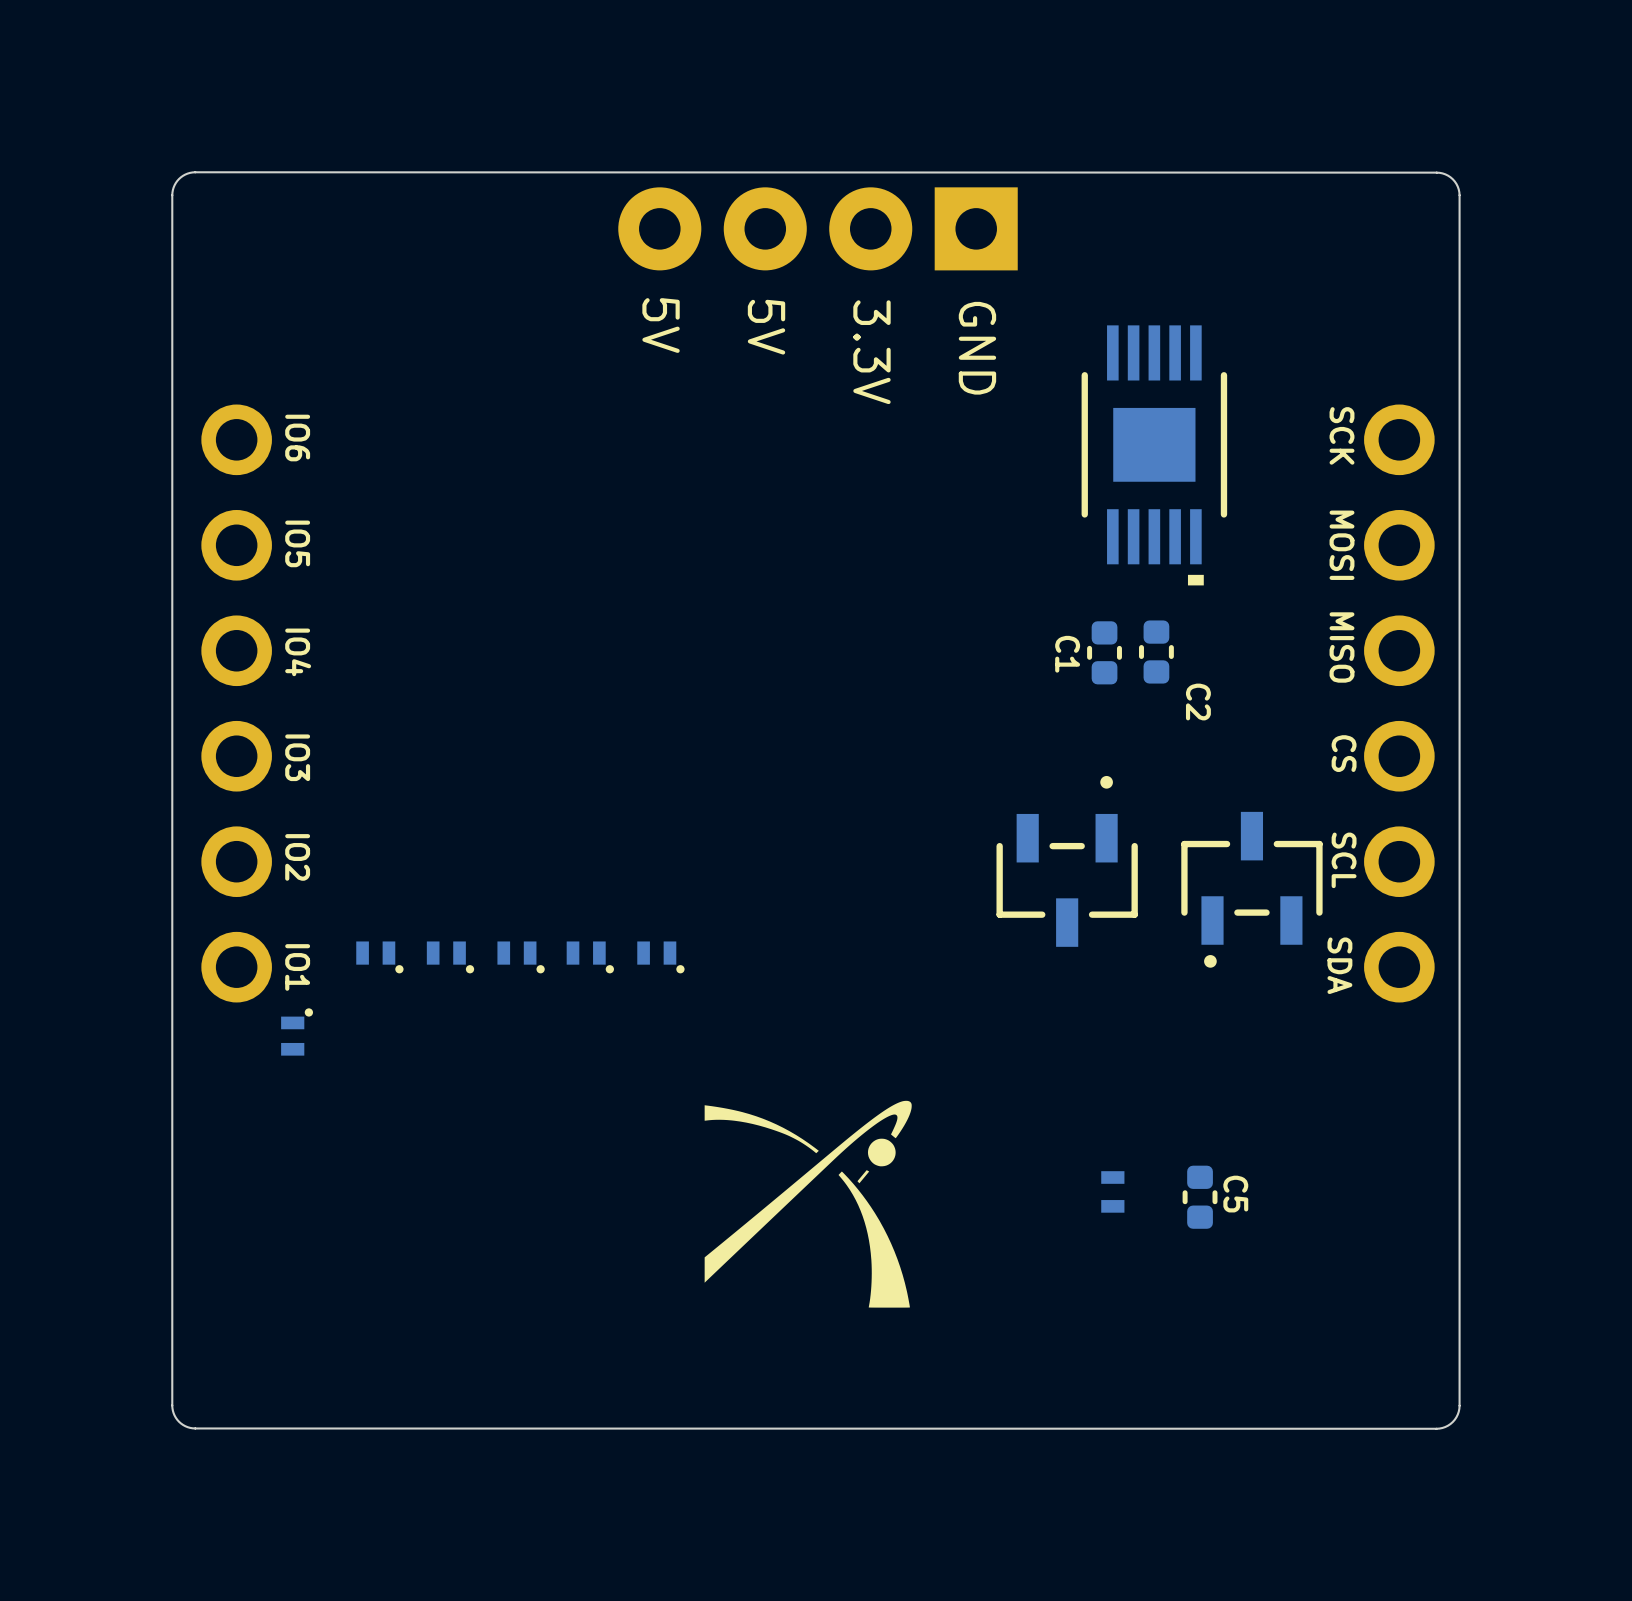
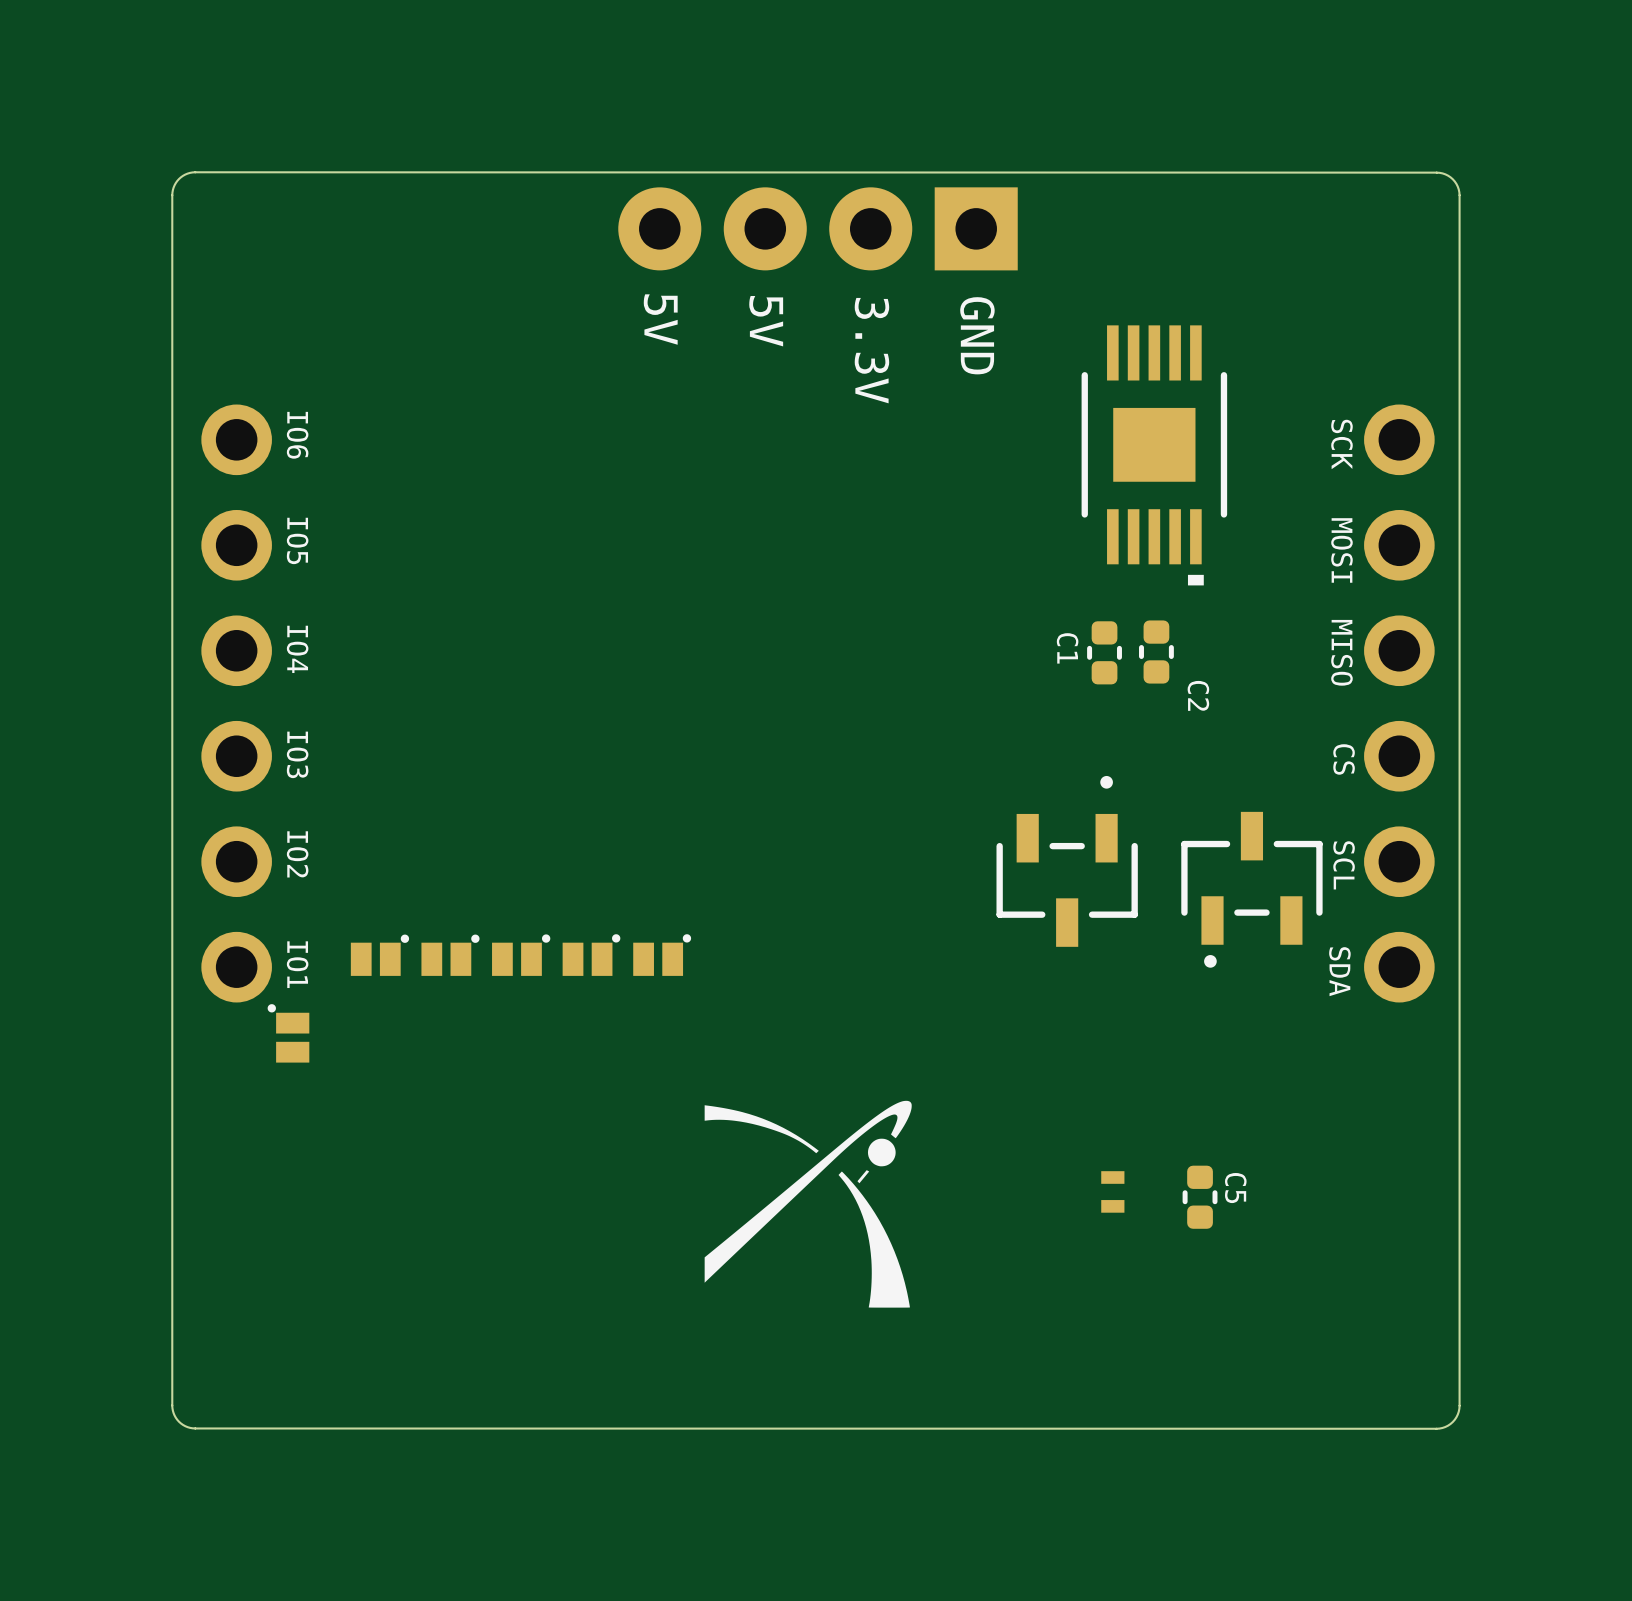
part footprint: [356, 941, 404, 974] -> [350, 934, 410, 976]
part footprint: [426, 941, 475, 974] -> [421, 934, 480, 976]
part footprint: [497, 941, 545, 974] -> [492, 934, 551, 976]
part footprint: [566, 941, 614, 974] -> [562, 934, 621, 976]
part footprint: [637, 941, 685, 974] -> [633, 934, 692, 976]
part footprint: [281, 1008, 314, 1056] -> [267, 1004, 310, 1063]

